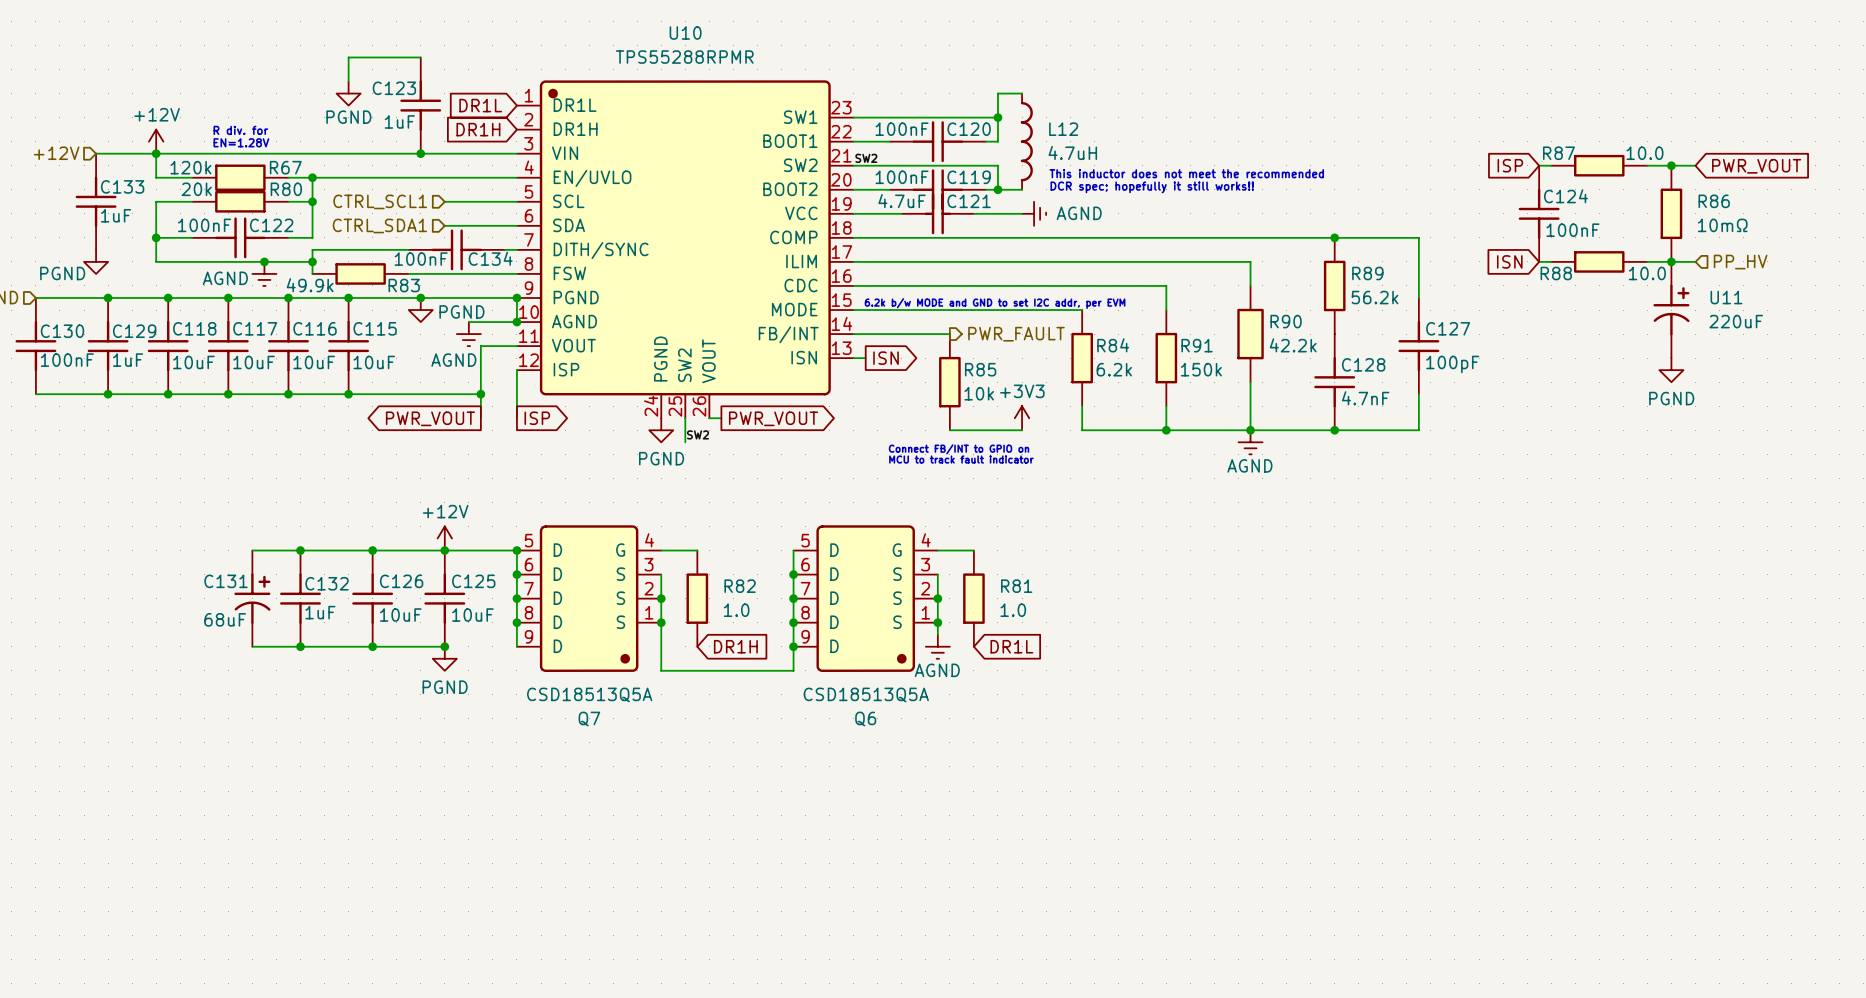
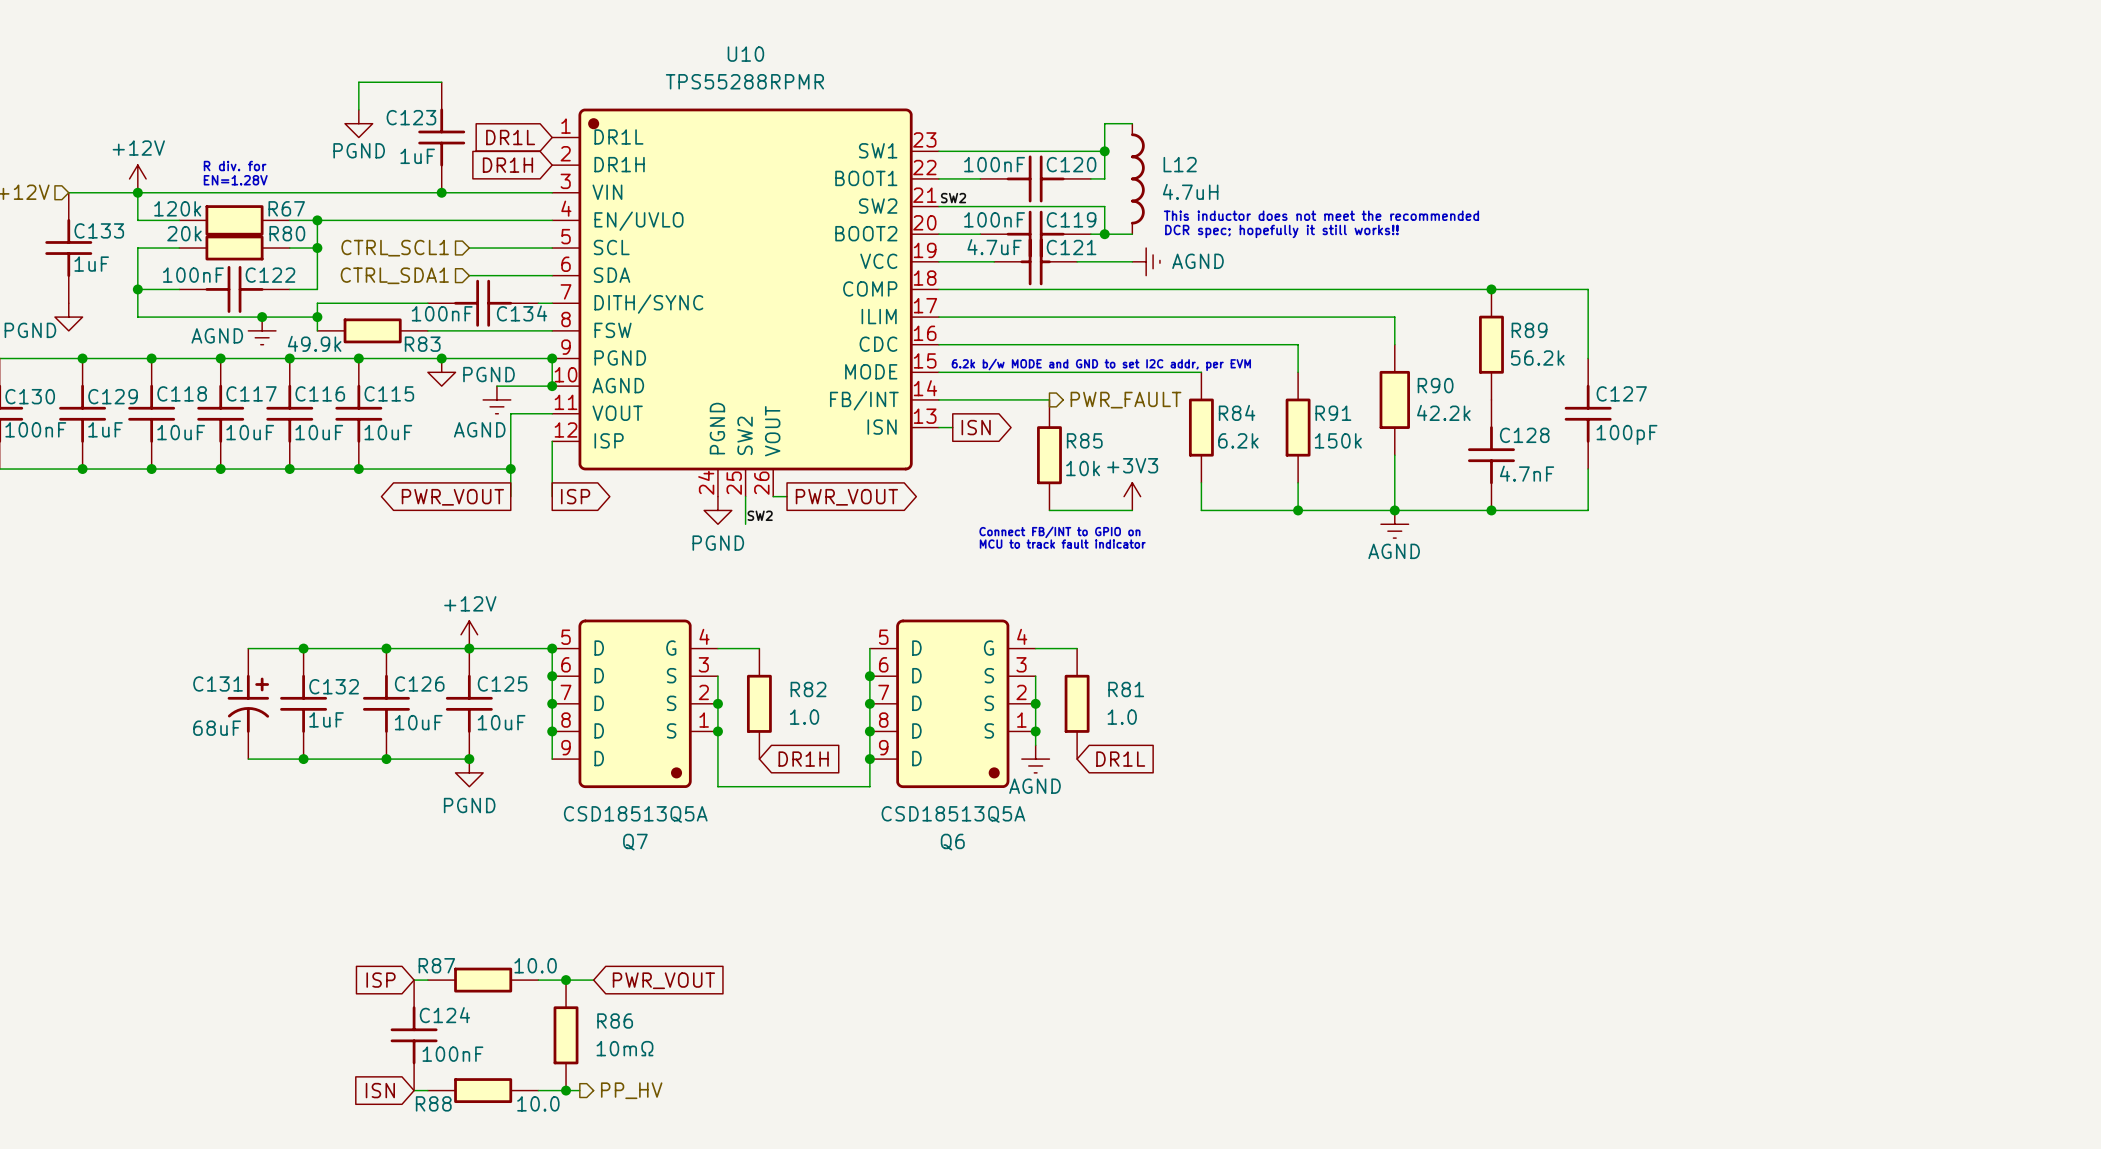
global label: ISP (1510, 165) -> none
wire: (1539, 165) (1551, 165) -> none
R87 position: (1599, 165) -> (483, 980)
wire: (1647, 165) (1695, 165) -> none
junction: (1671, 165) -> none
global label: PWR_VOUT (1756, 166) -> none
C124 position: (1539, 213) -> (414, 1035)
R86 position: (1671, 213) -> (566, 1035)
global label: ISN (1509, 261) -> none
wire: (1539, 261) (1551, 261) -> none
R88 position: (1599, 261) -> (483, 1090)
wire: (1647, 261) (1695, 261) -> none
junction: (1671, 261) -> none
hierarchical label: PP_HV (1740, 262) -> none
U11: 220uF (1671, 310) -> none
power symbol: PGND (1671, 370) -> none
global label: none -> ISP (381, 980)
wire: none -> (414, 980) (427, 980)
wire: none -> (538, 980) (593, 980)
junction: none -> (566, 980)
global label: none -> PWR_VOUT (663, 980)
global label: none -> ISN (380, 1090)
wire: none -> (414, 1090) (427, 1090)
wire: none -> (538, 1090) (579, 1090)
junction: none -> (566, 1090)
hierarchical label: none -> PP_HV (631, 1090)

